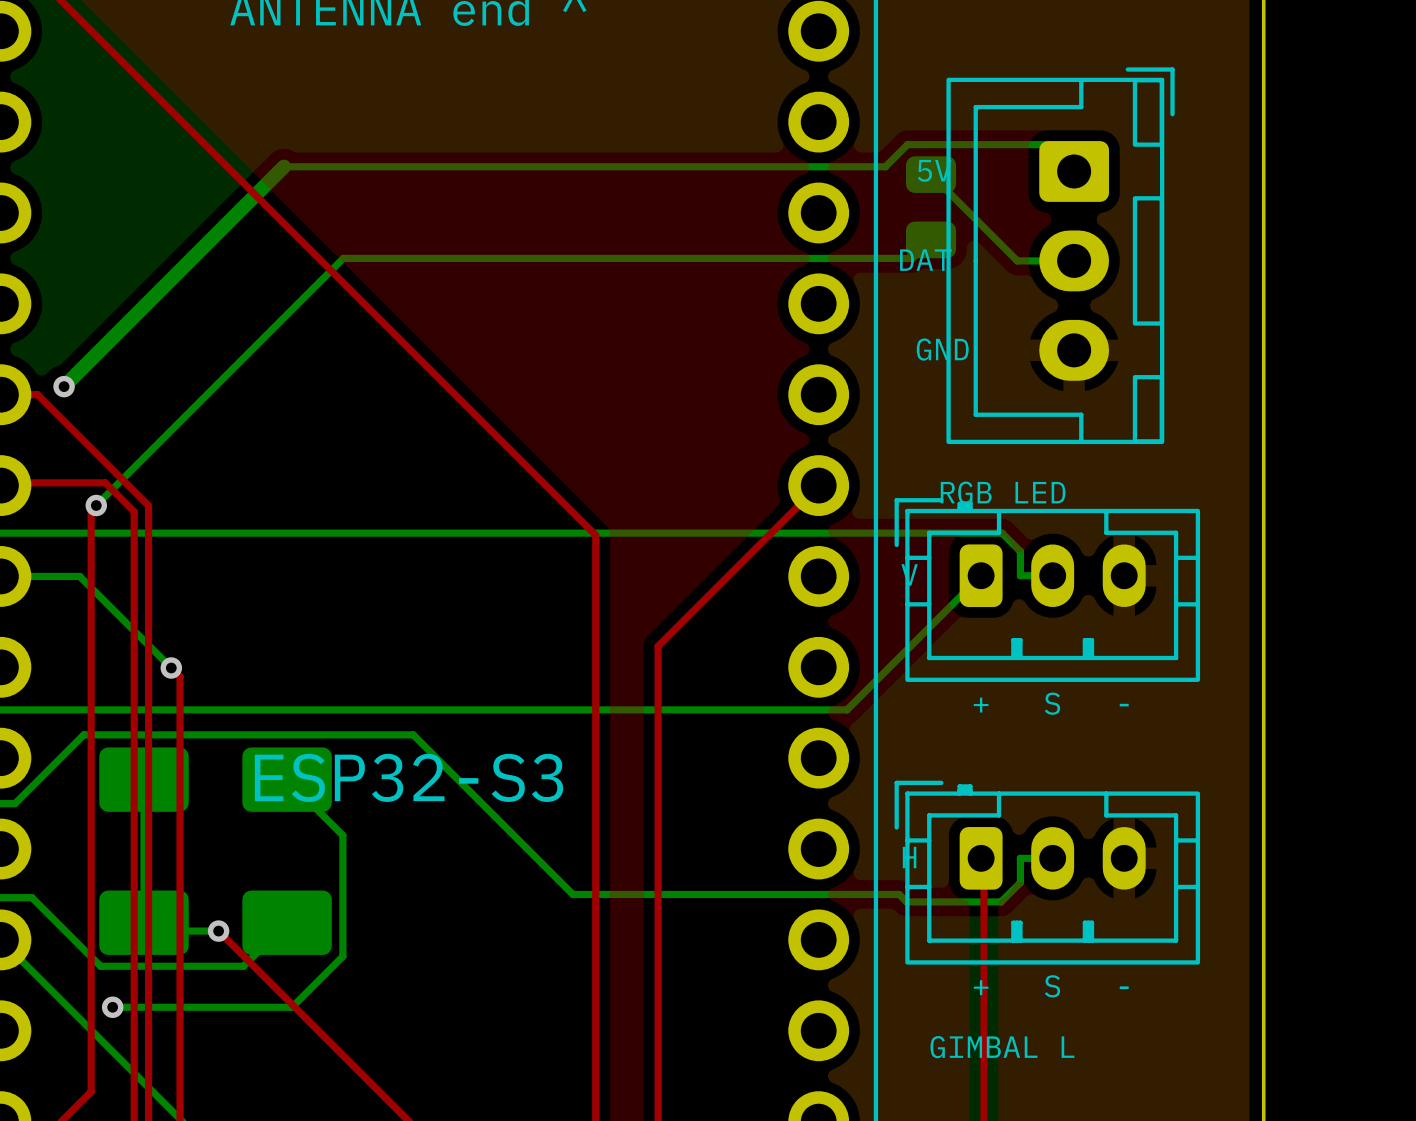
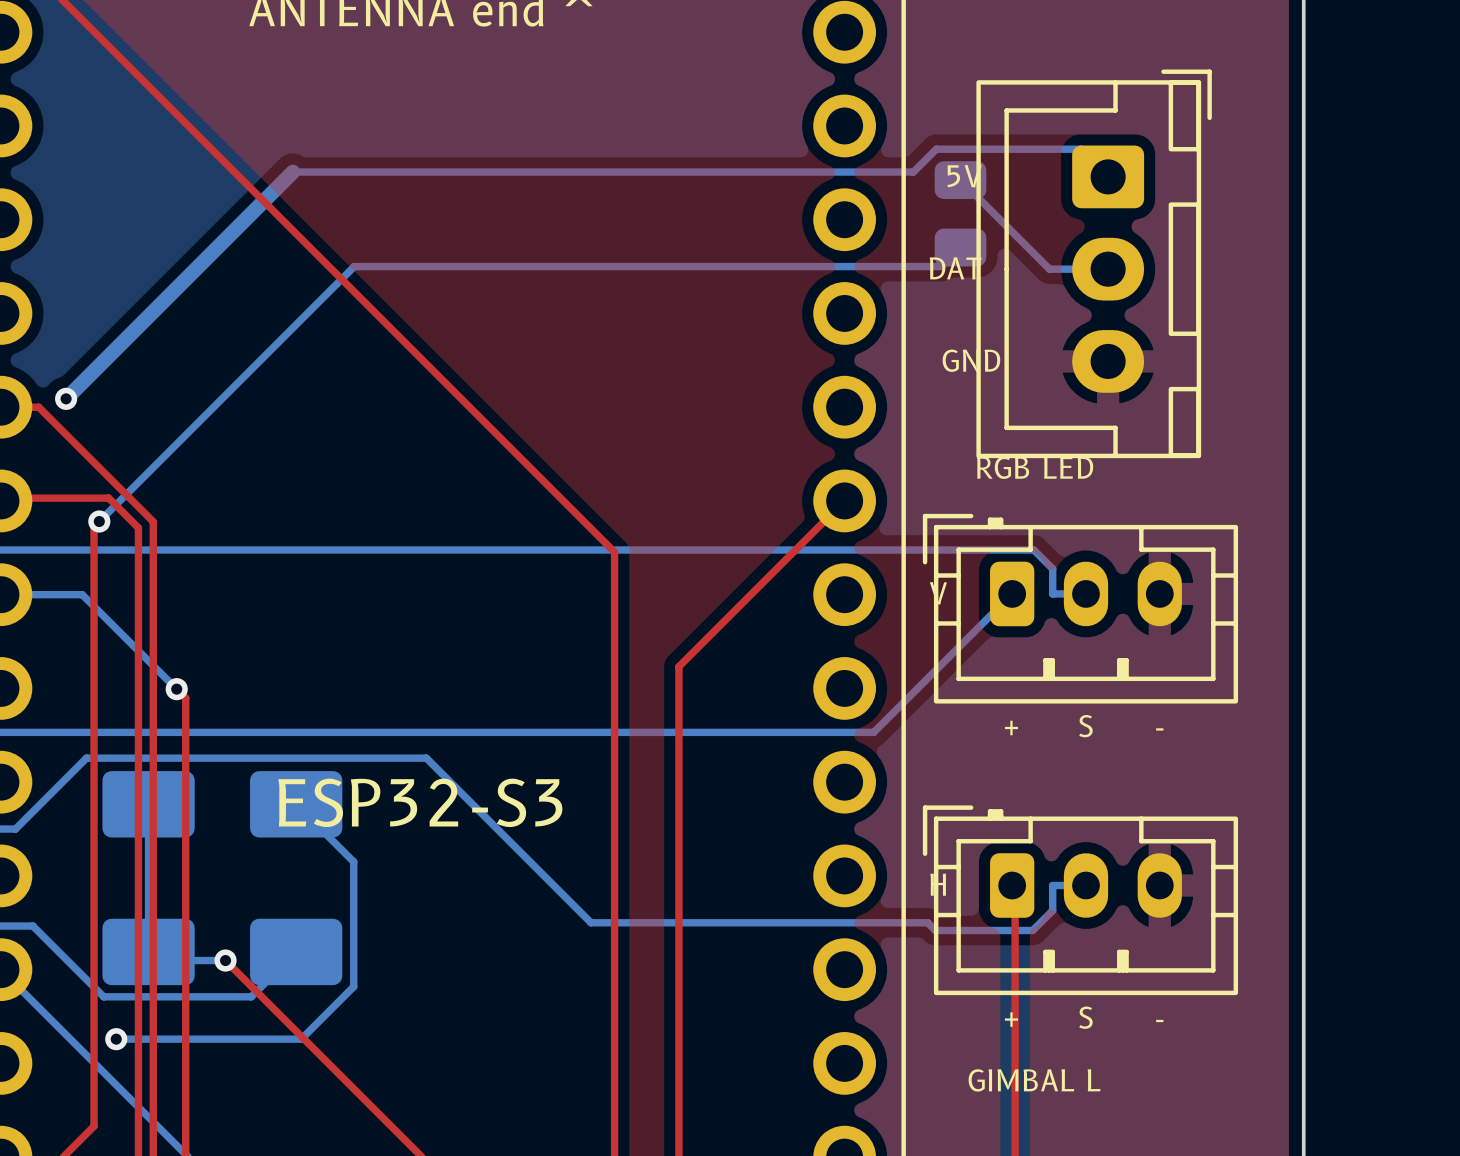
text position: RGB LED (1003, 492) -> RGB LED (1035, 467)

